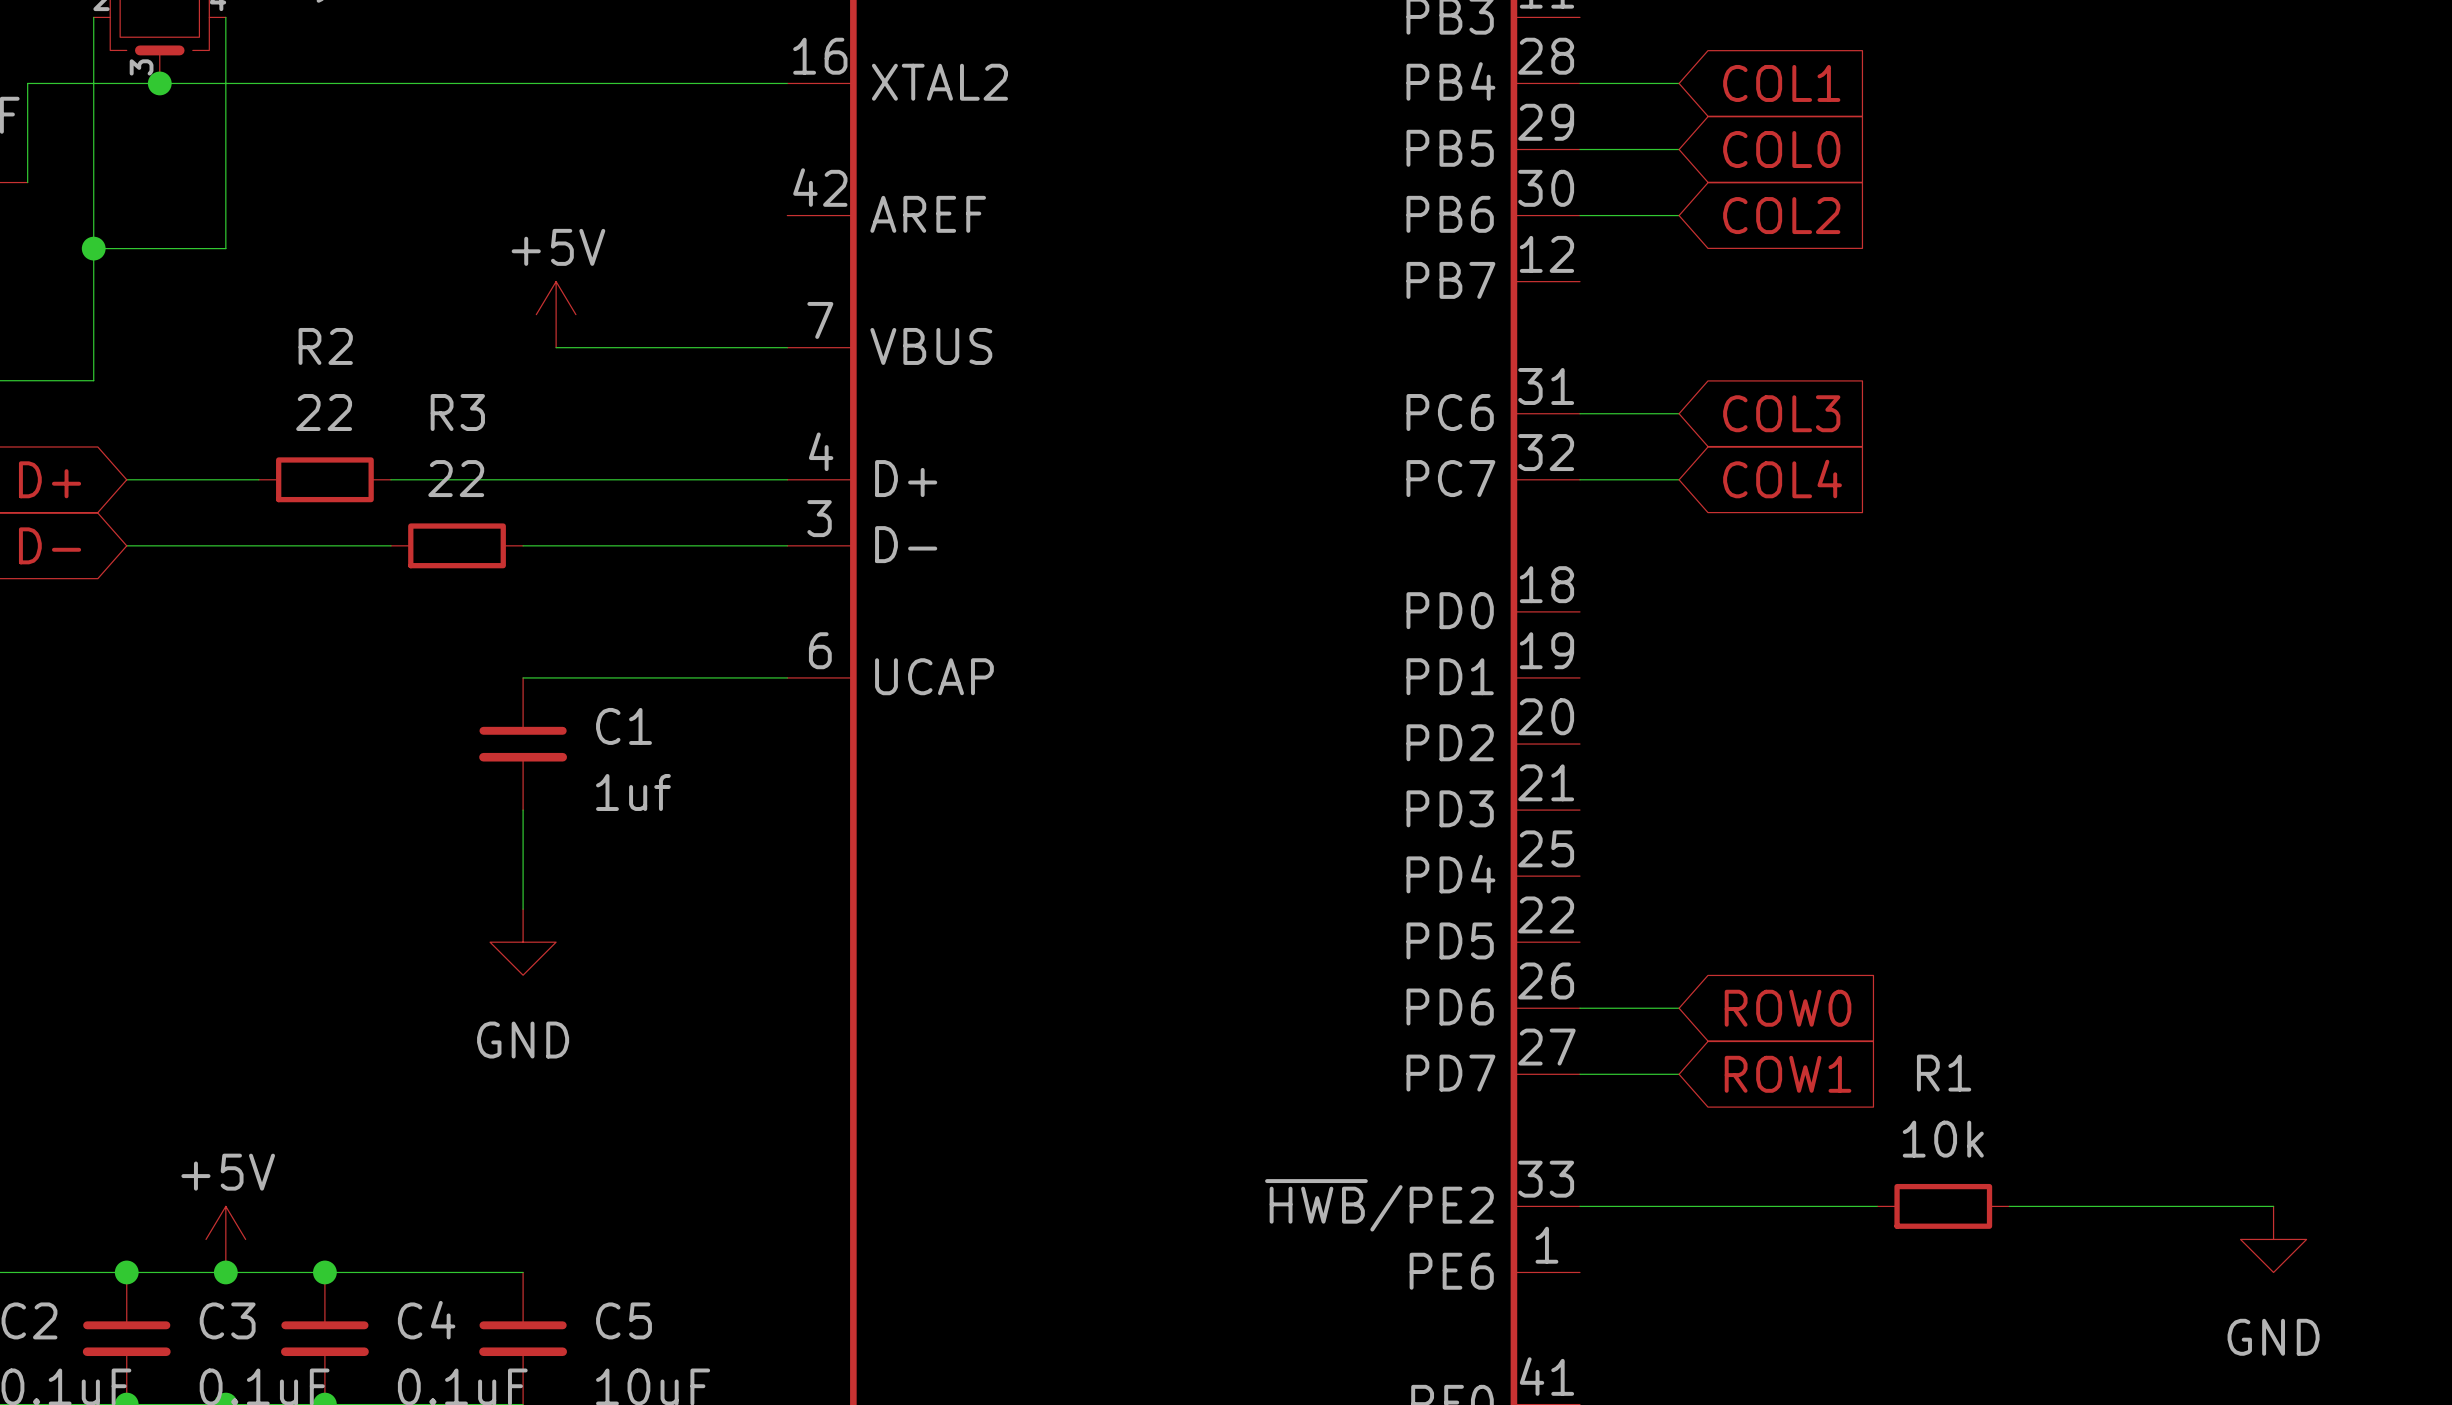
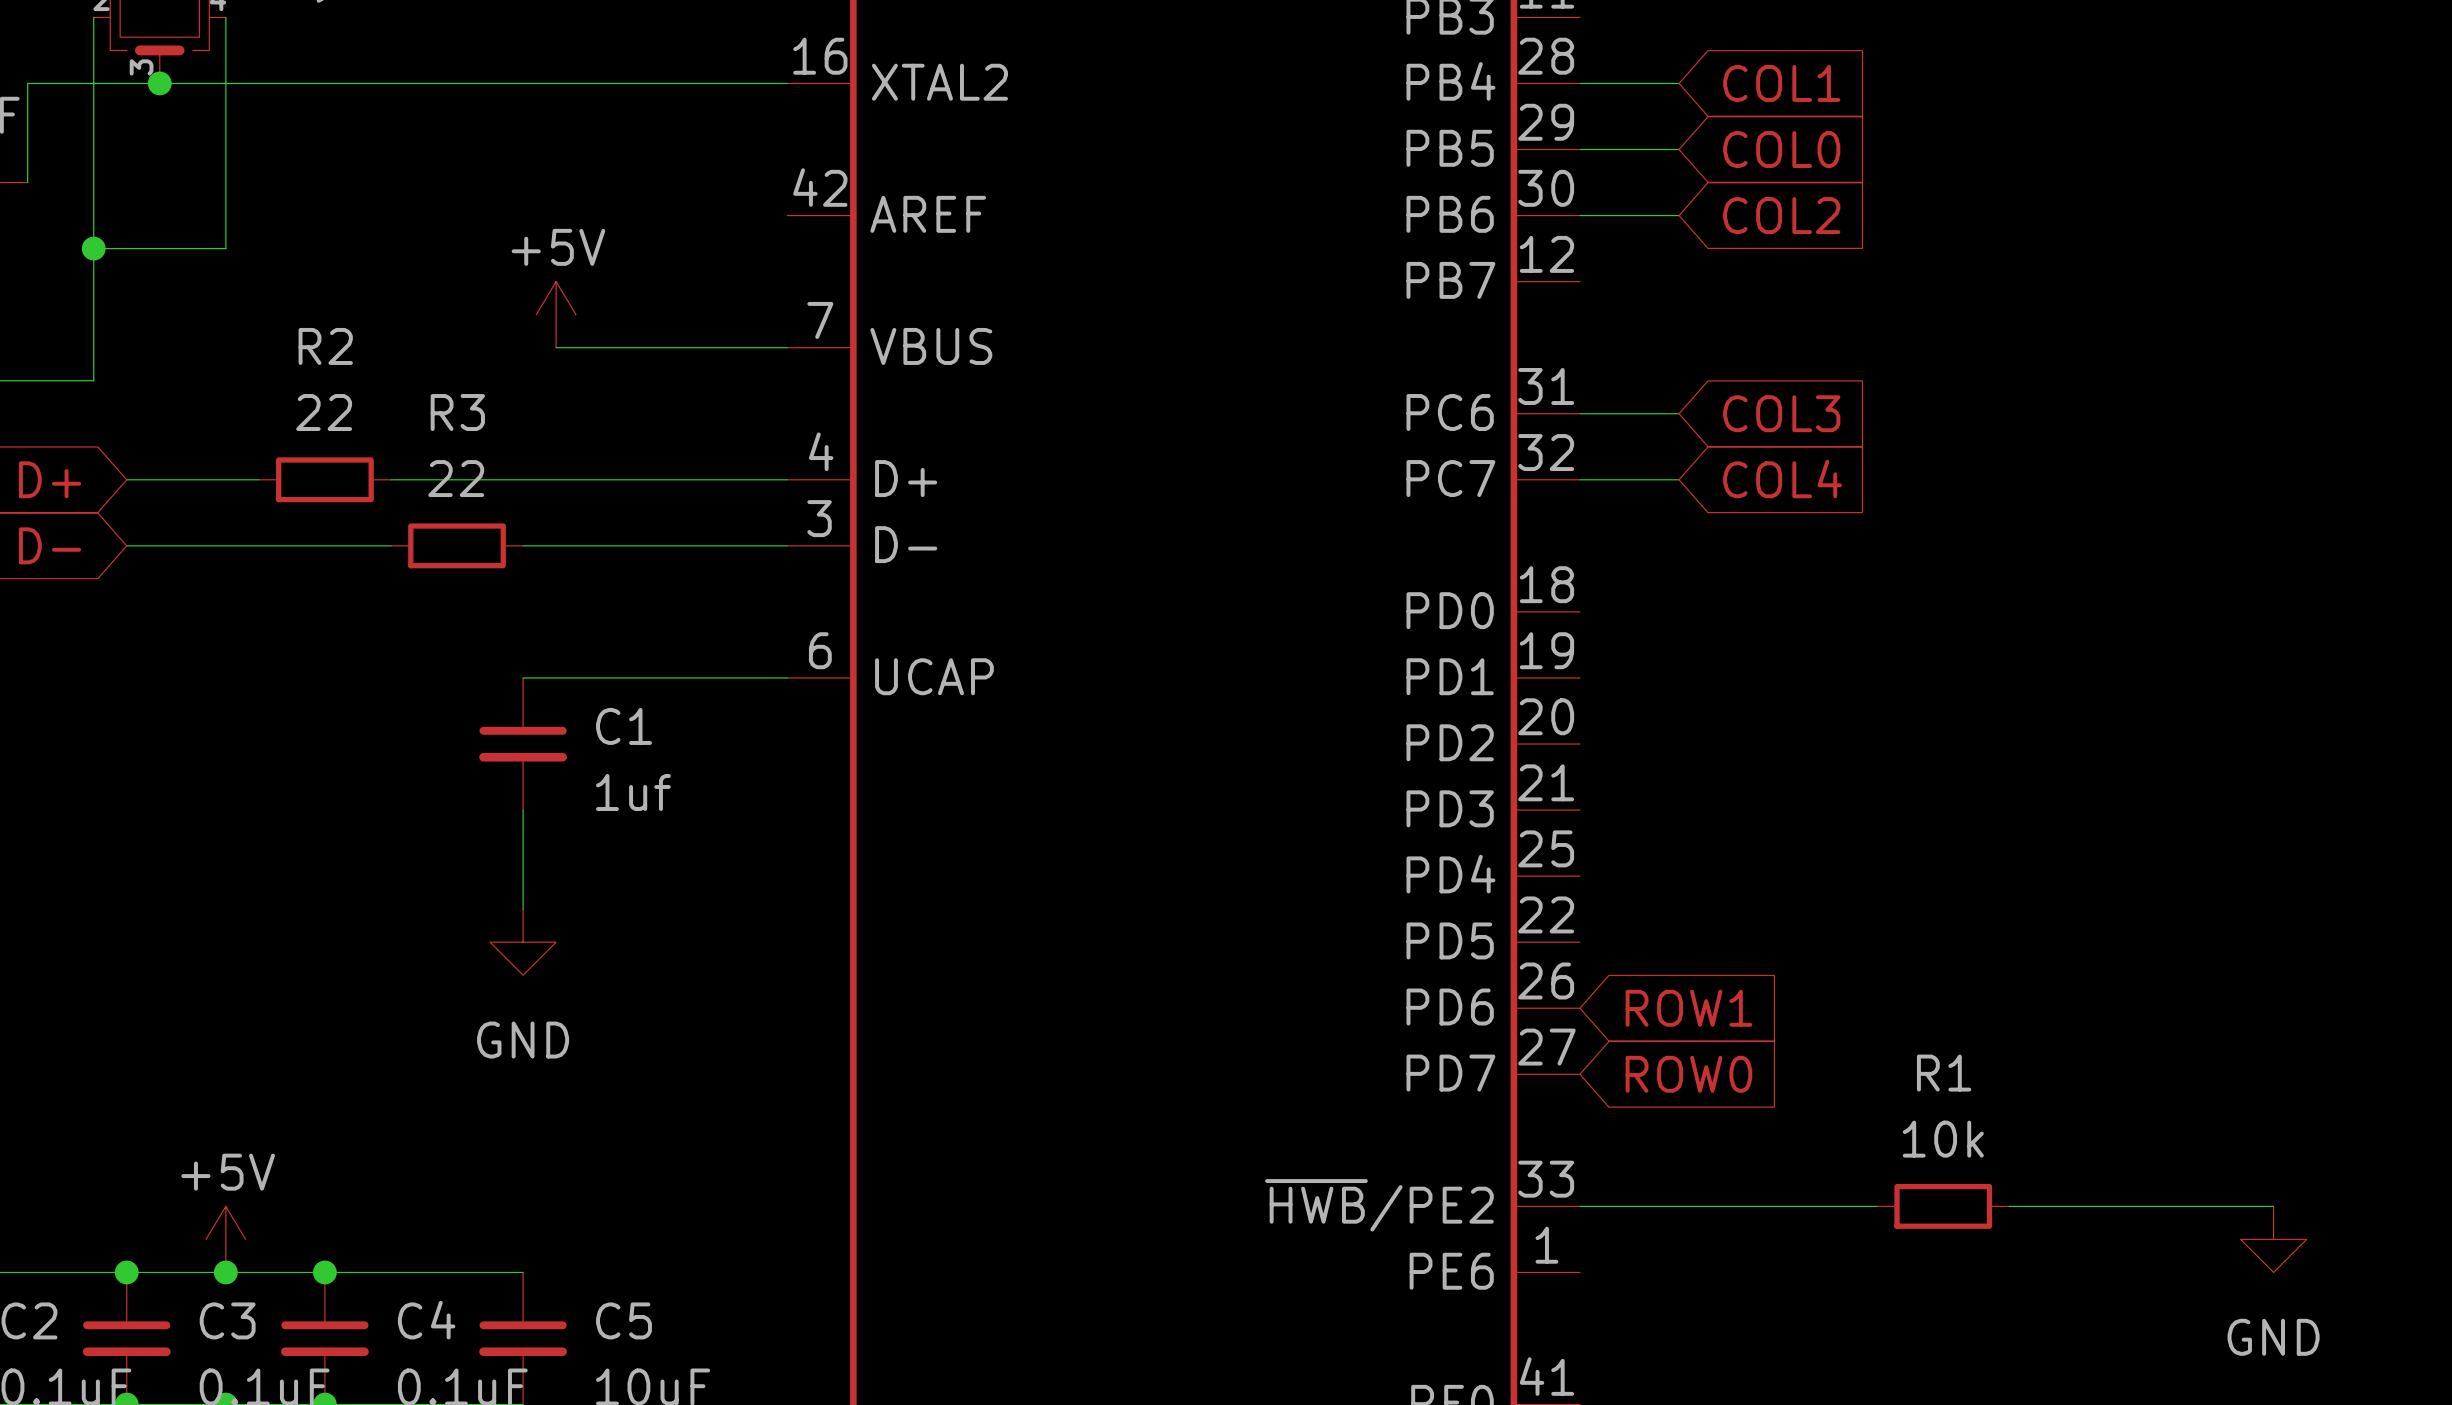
wire: (1579, 1008) (1679, 1008) -> none
global label position: ROW0 (1788, 1008) -> ROW0 (1688, 1074)
wire: (1579, 1074) (1679, 1074) -> none
global label position: ROW1 (1788, 1074) -> ROW1 (1688, 1008)

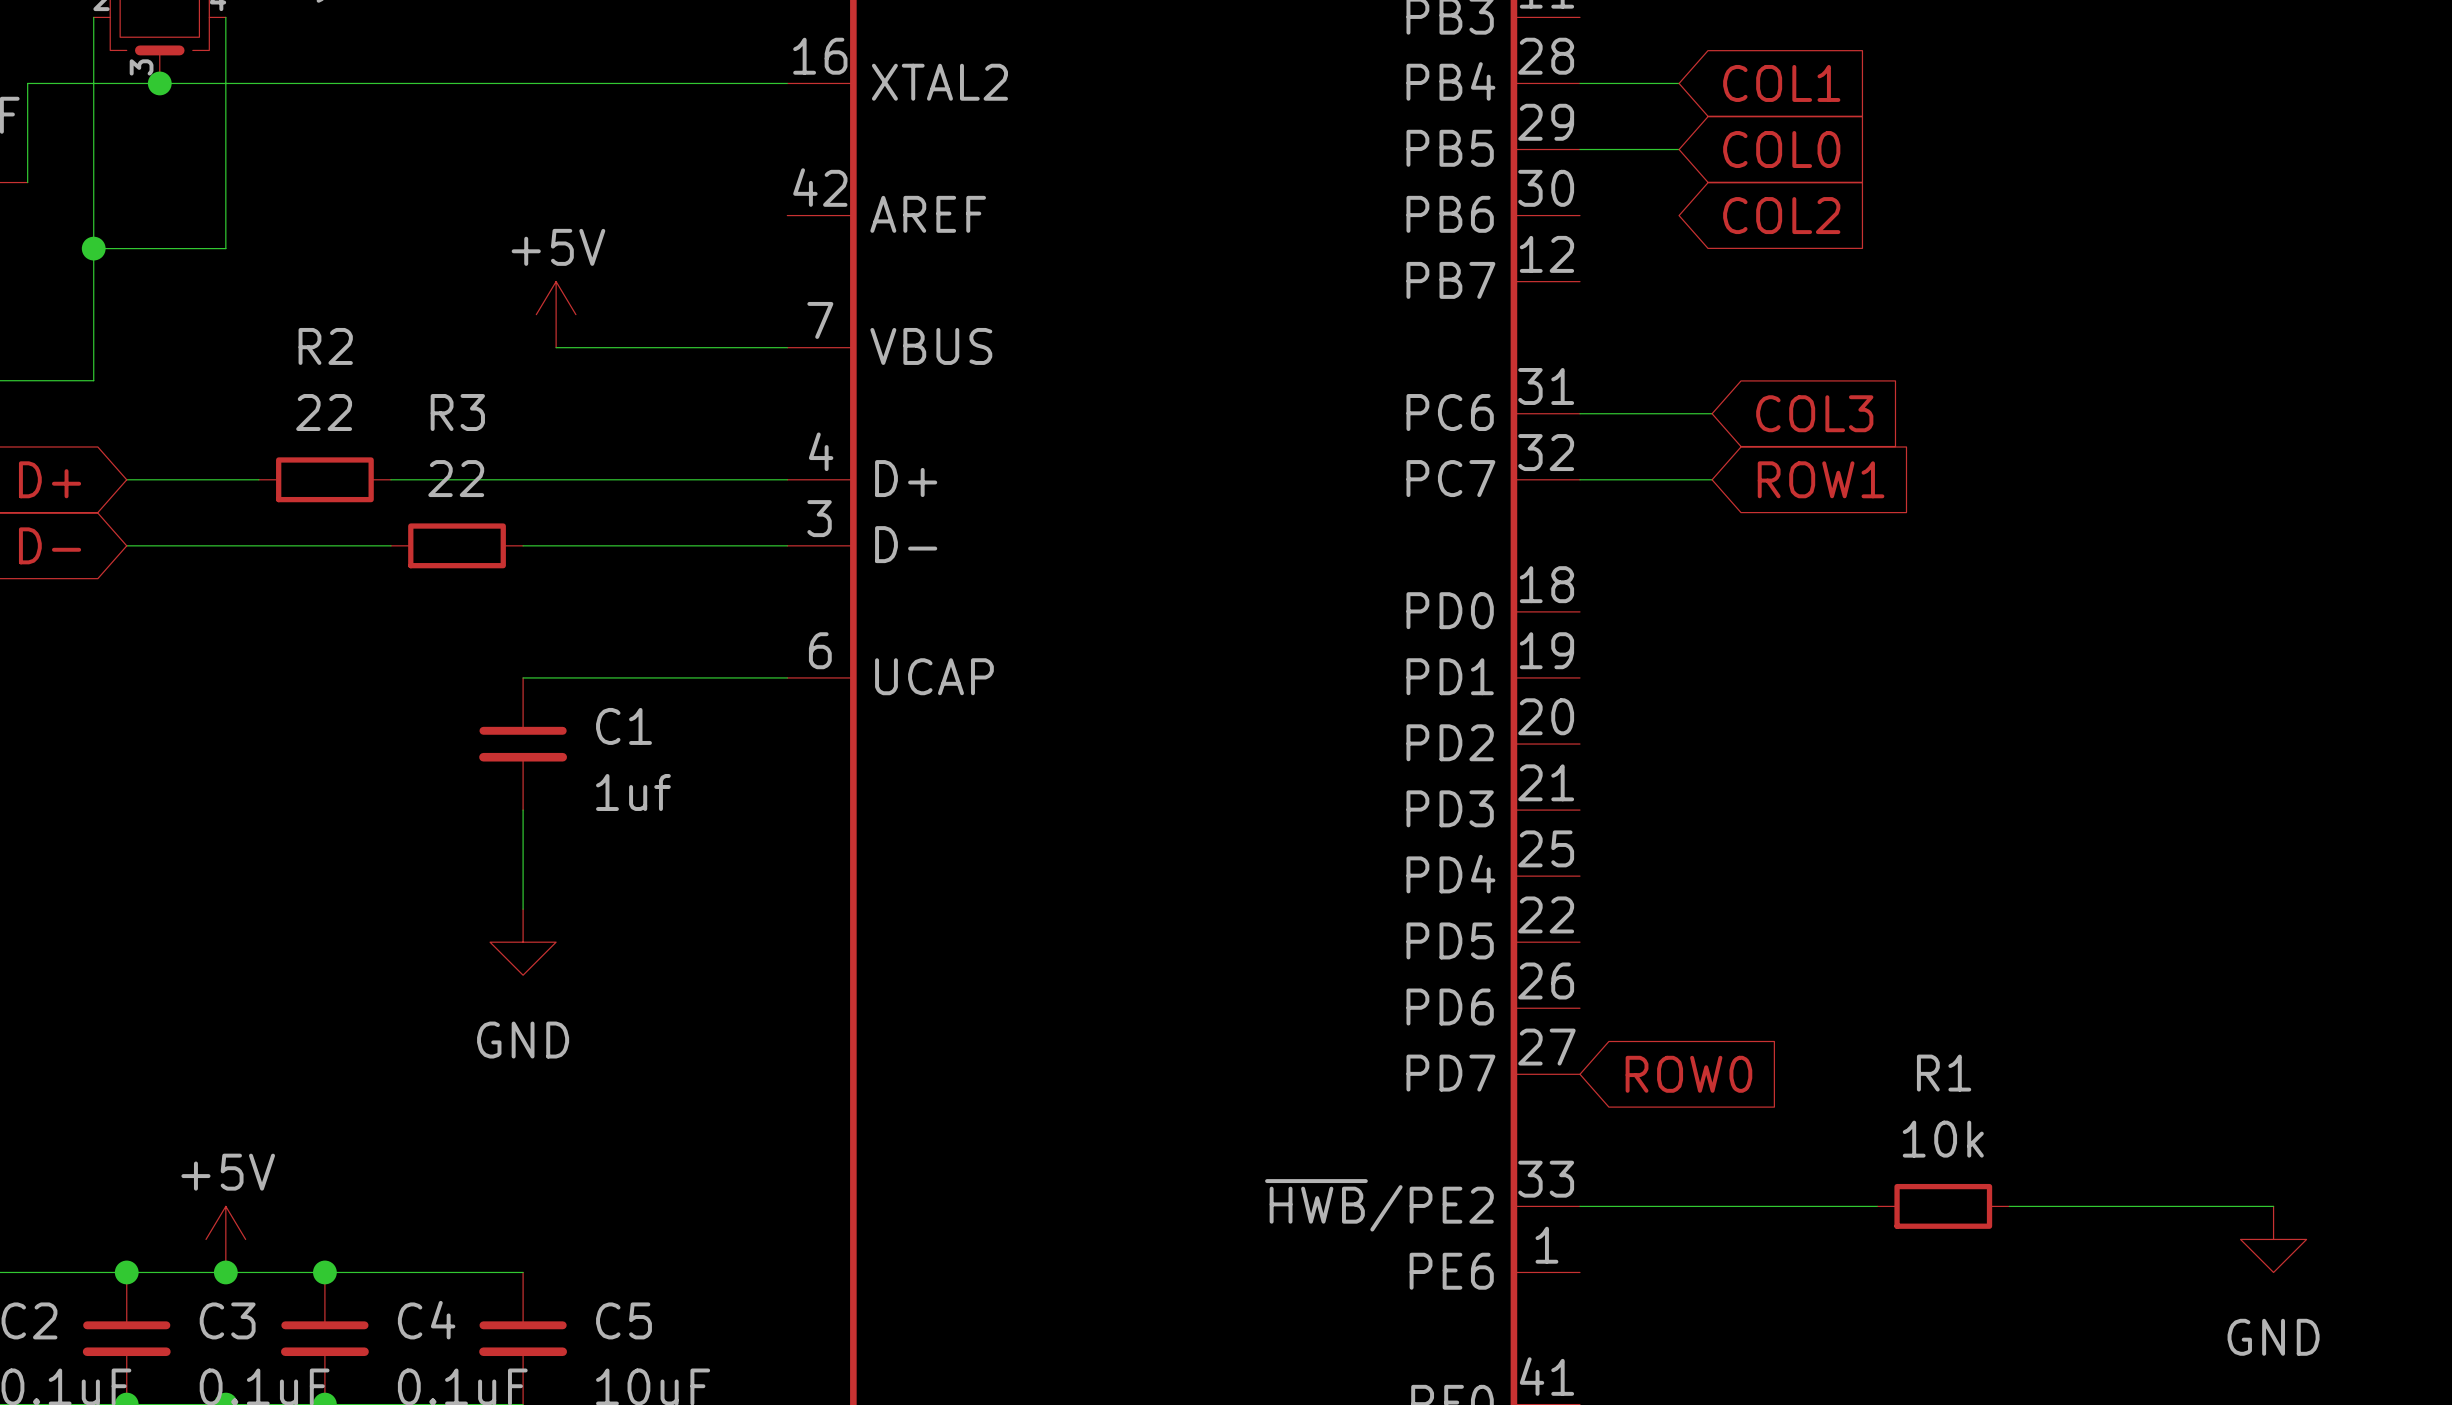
wire: (1579, 215) (1679, 215) -> none
wire: none -> (1679, 413) (1712, 413)
global label position: COL3 (1781, 413) -> COL3 (1814, 413)
wire: none -> (1679, 479) (1712, 479)
global label: COL4 (1782, 479) -> none
global label position: ROW1 (1688, 1008) -> ROW1 (1821, 479)

